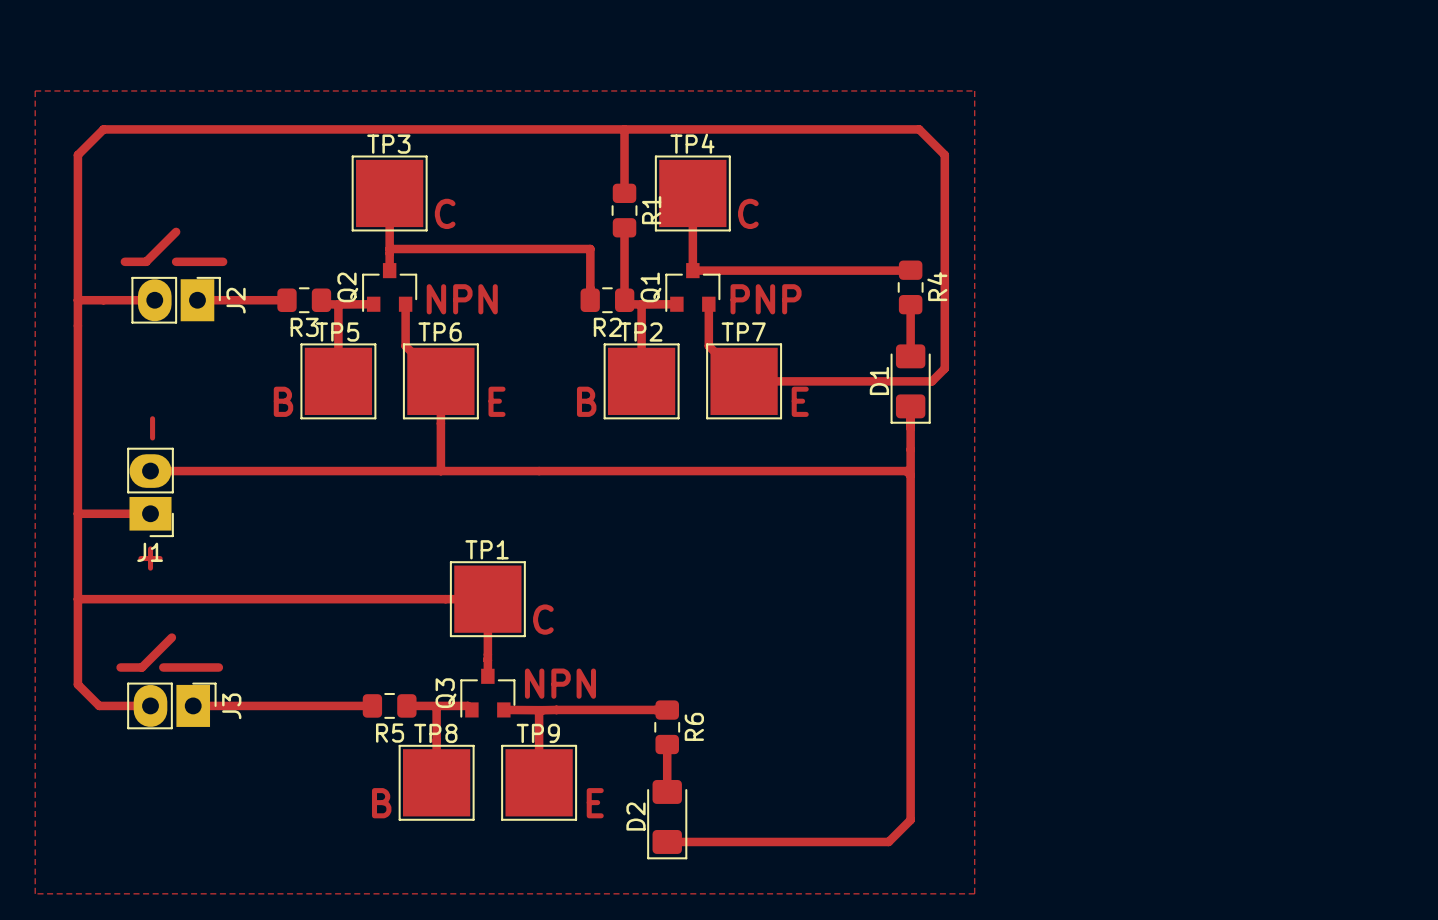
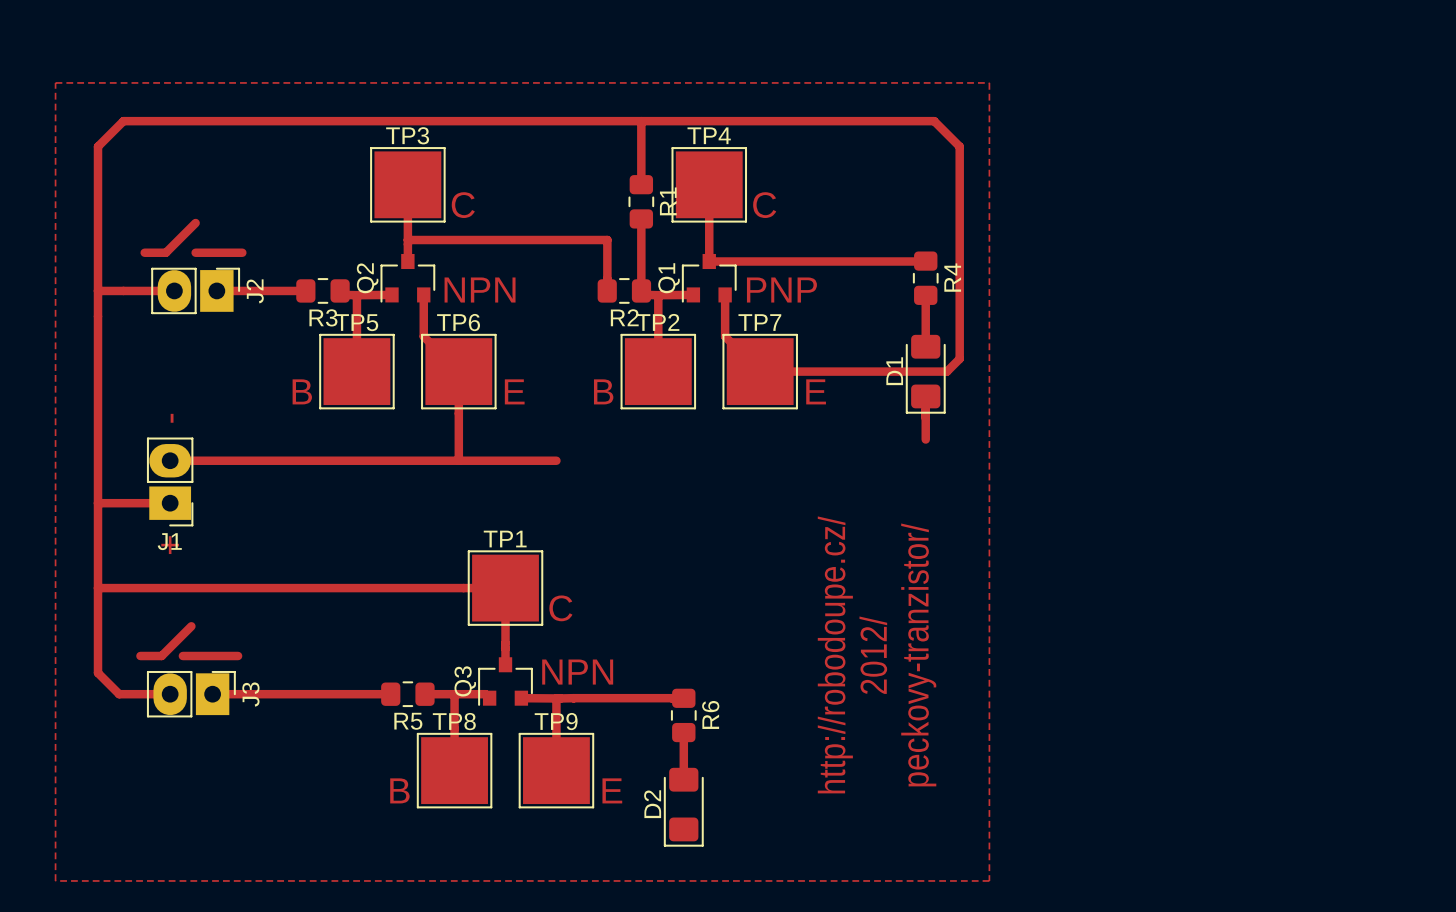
track: (910, 449) (910, 820) (888, 841) (667, 841) -> none
track: (539, 471) (906, 471) (910, 475) -> none
text: none -> http://robodoupe.cz/ (835, 654)
text: none -> peckovy-tranzistor/ (918, 654)
text: none -> 2012/ (873, 655)

